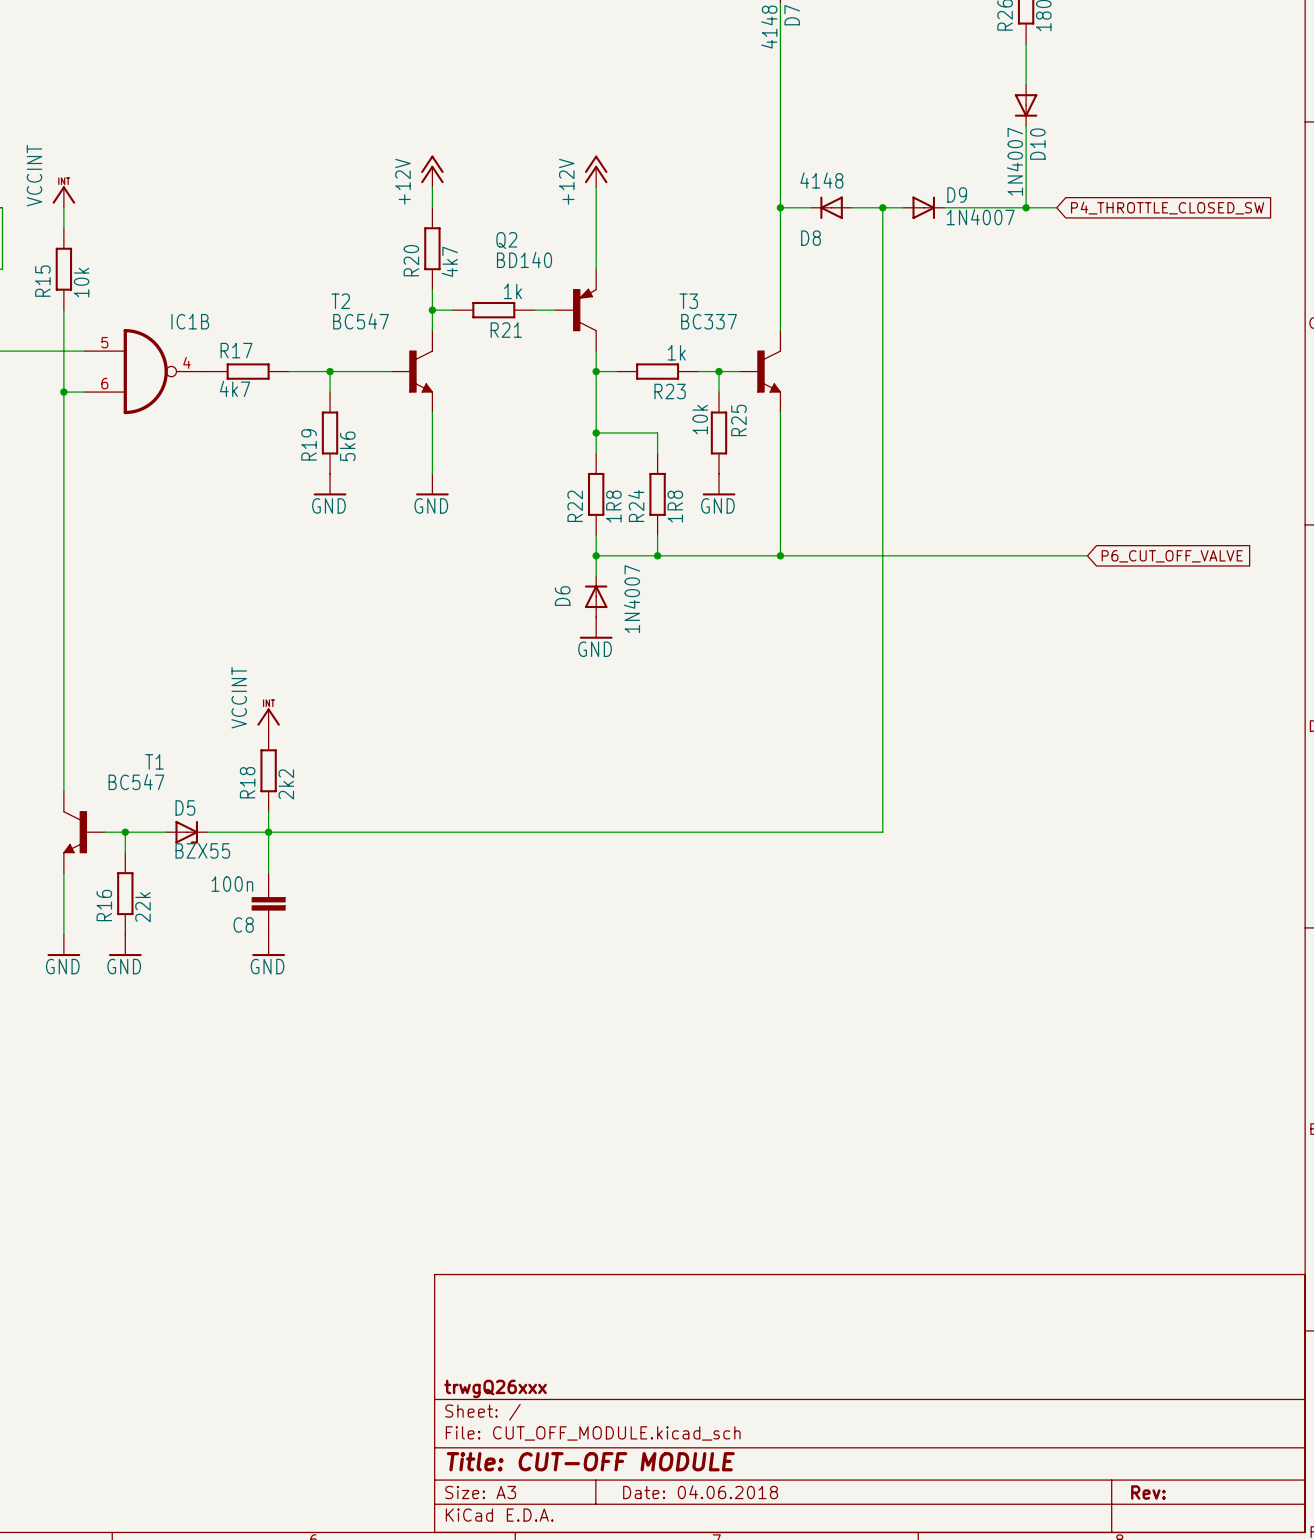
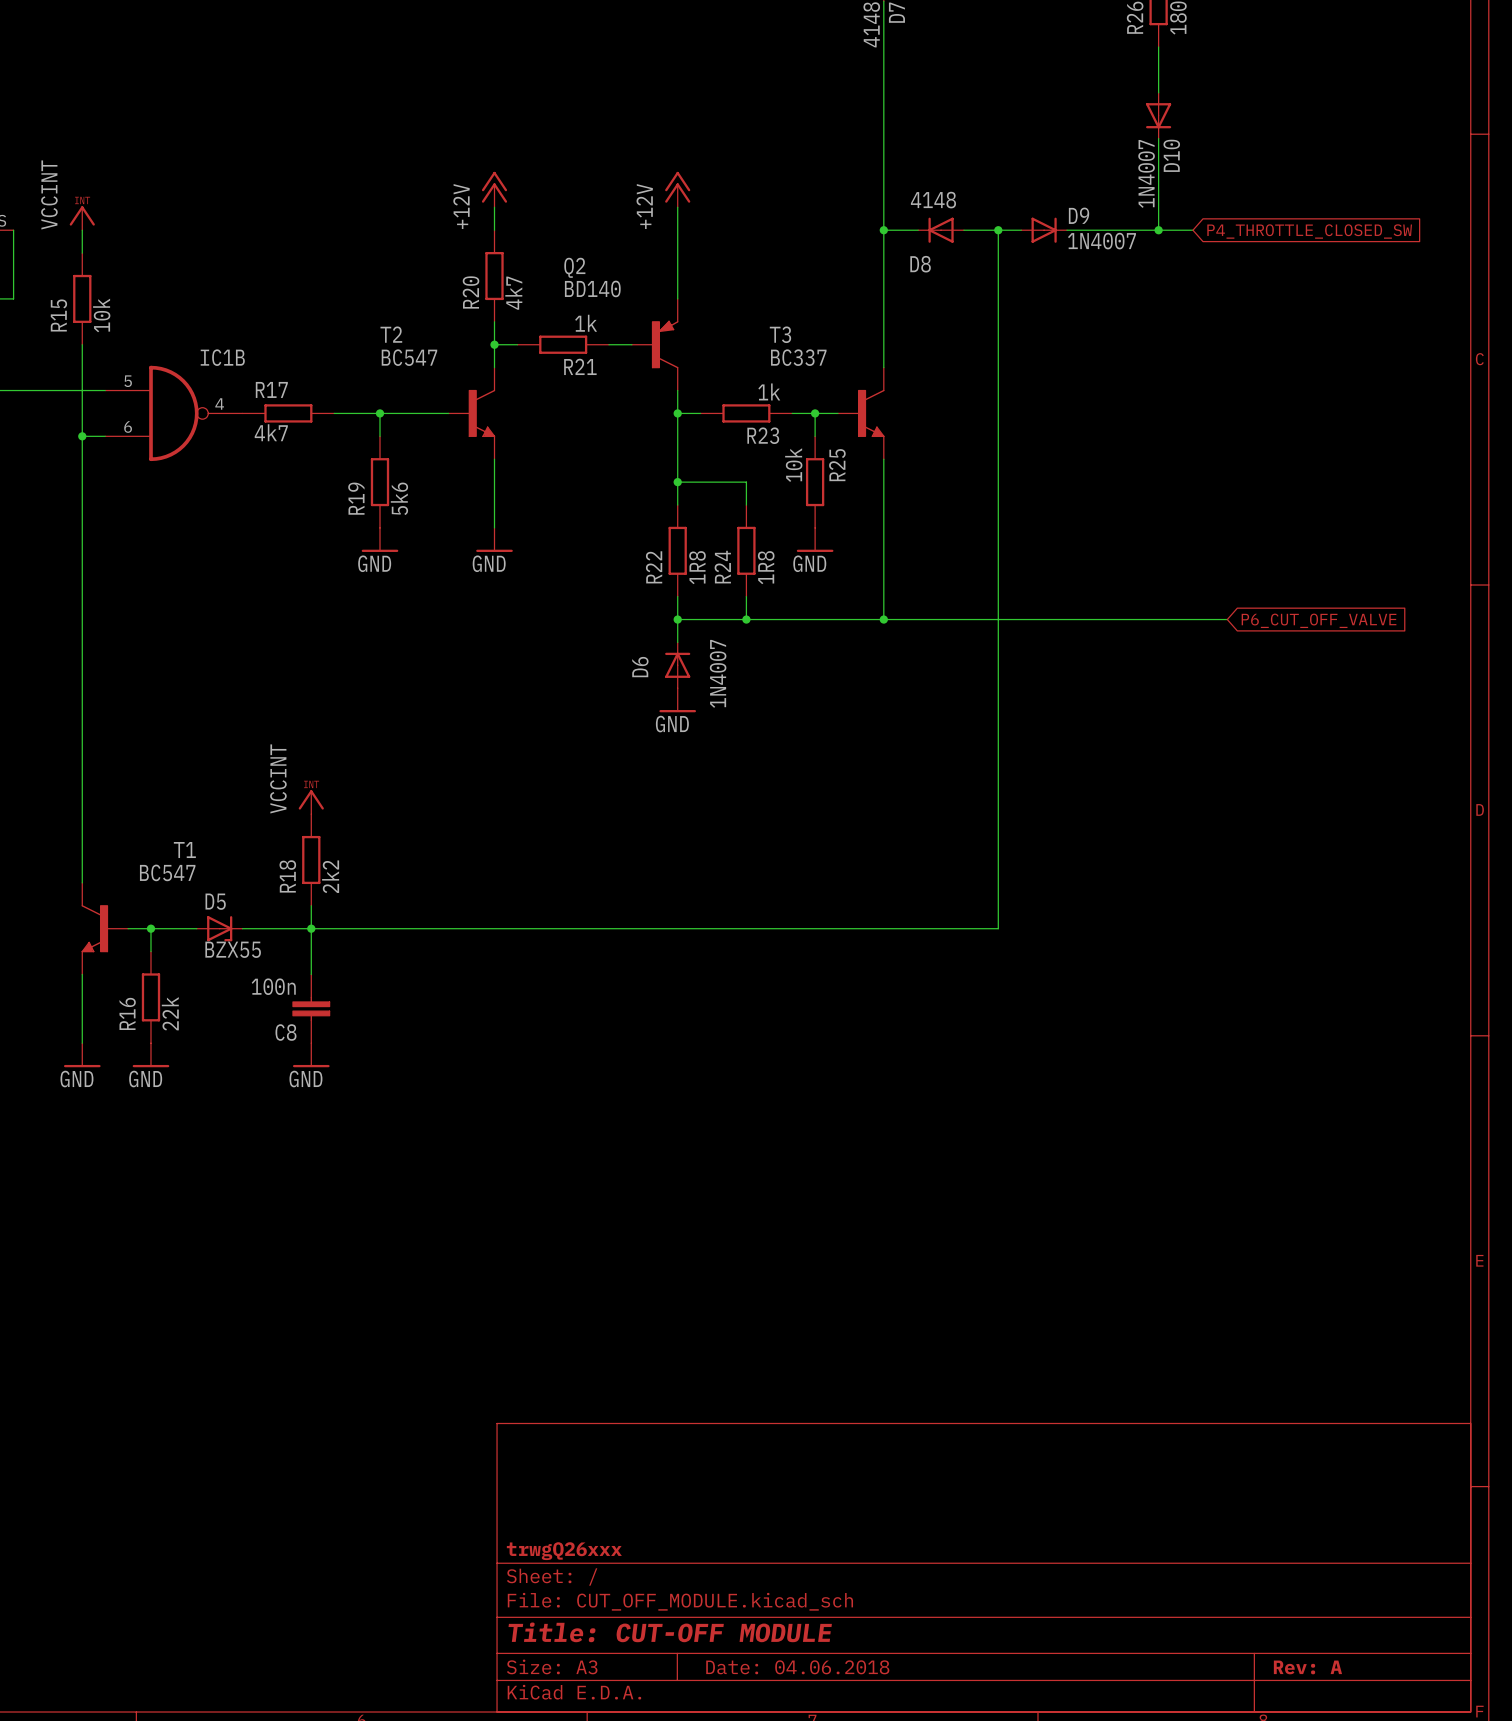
title block: Rev: (1148, 1492) -> Rev: A (1307, 1667)

